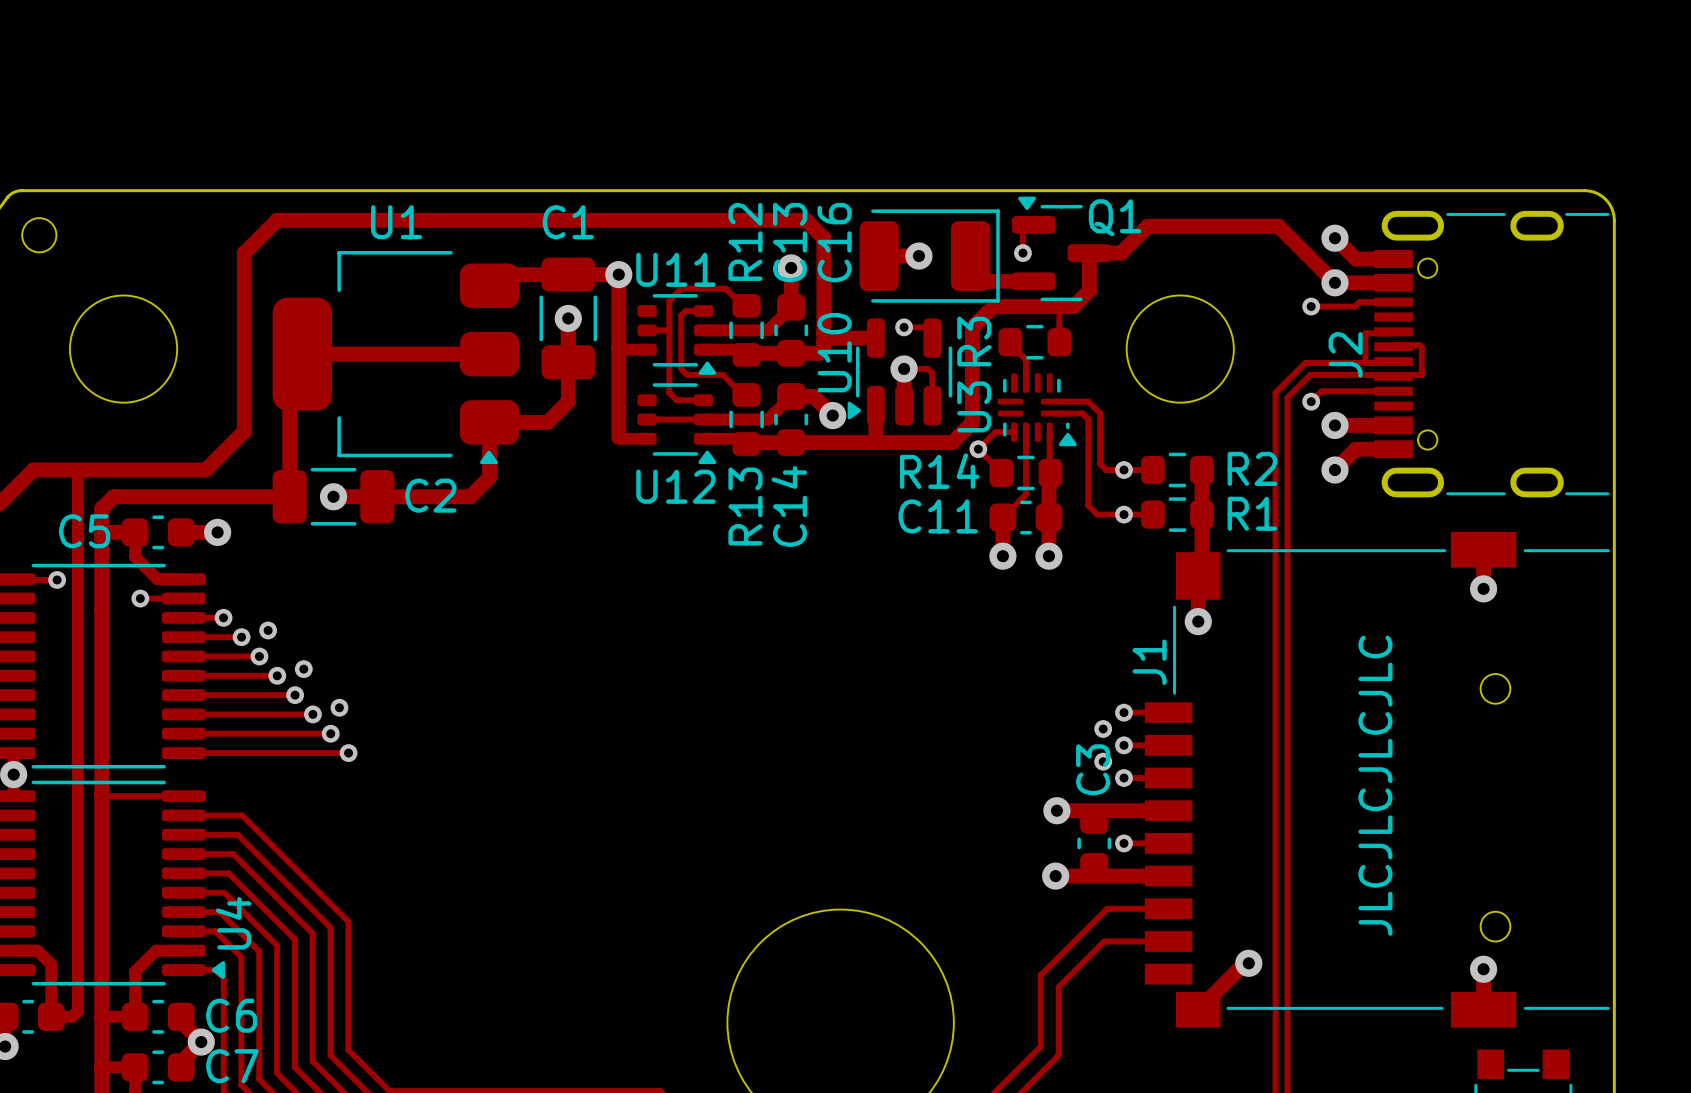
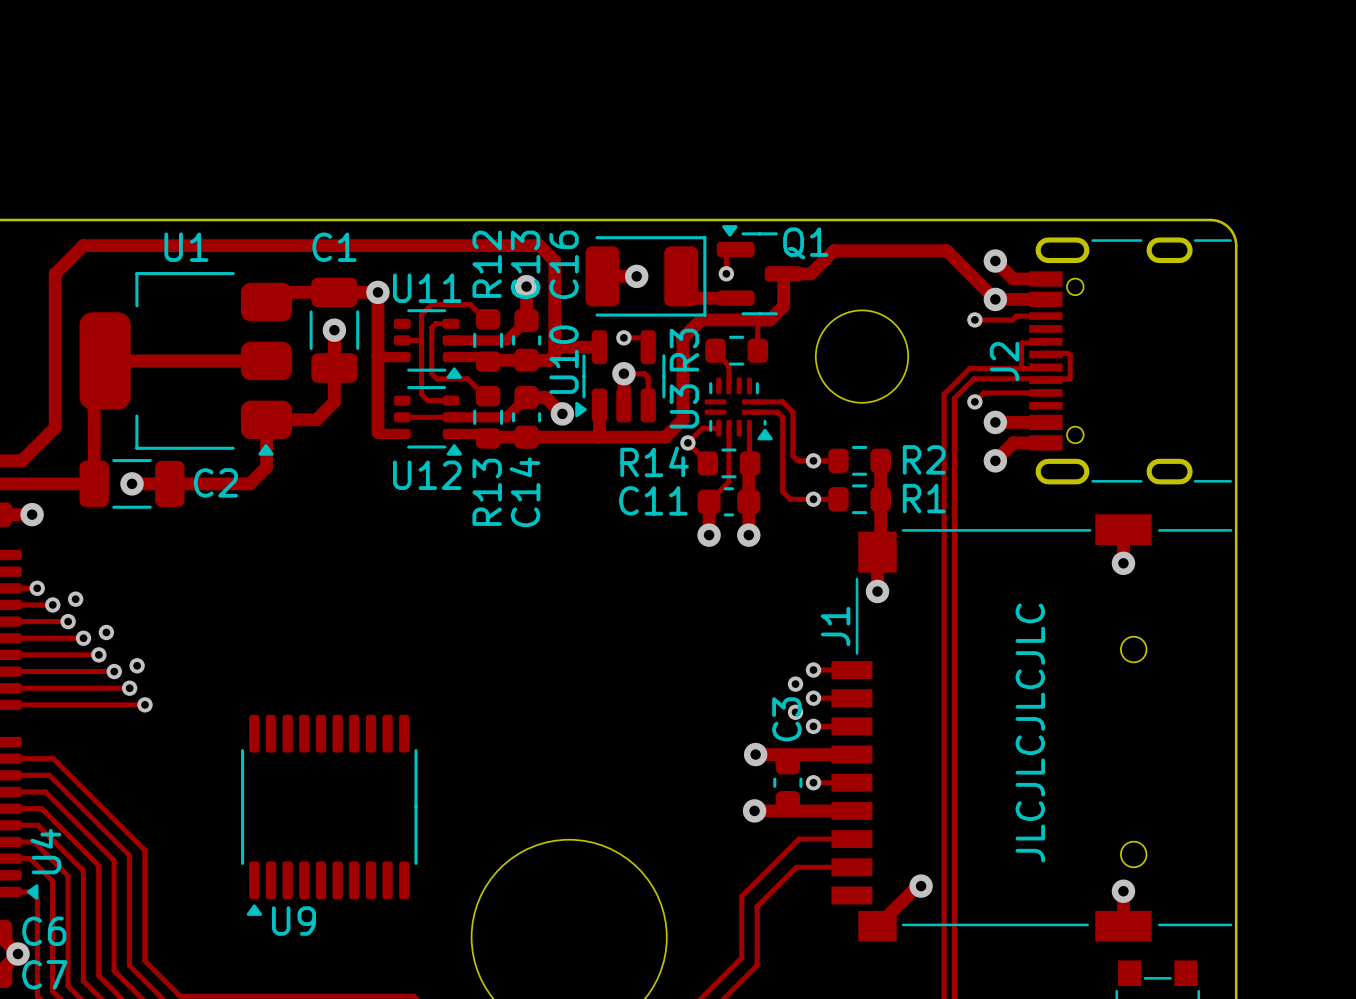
U9: none -> (329, 815)

